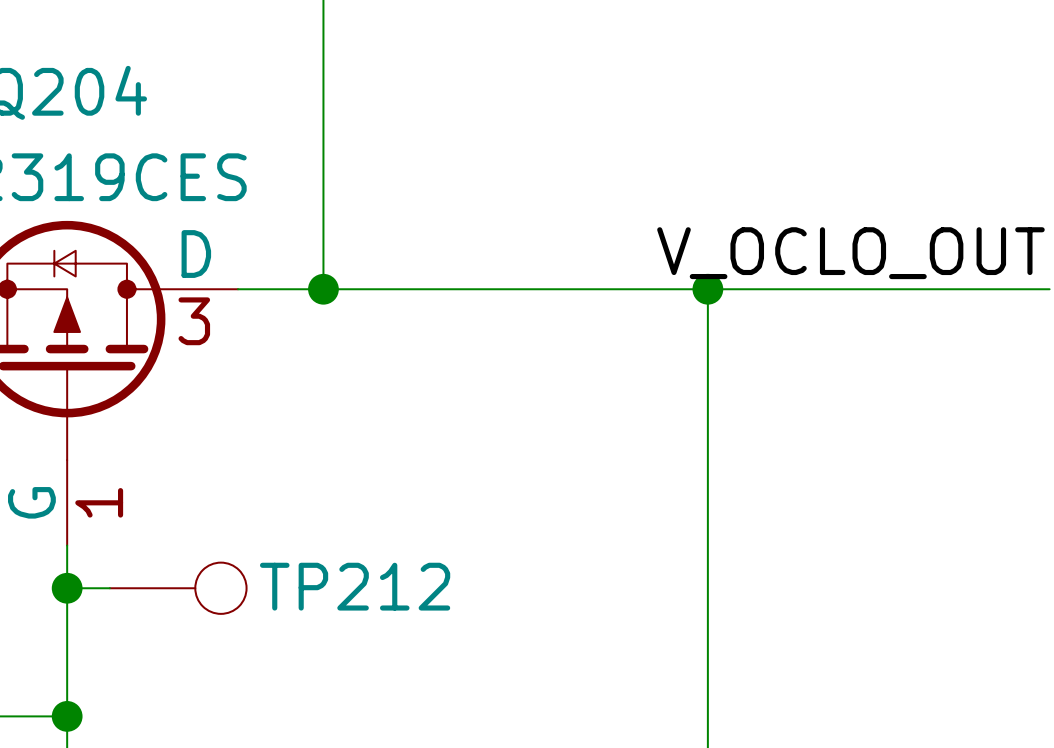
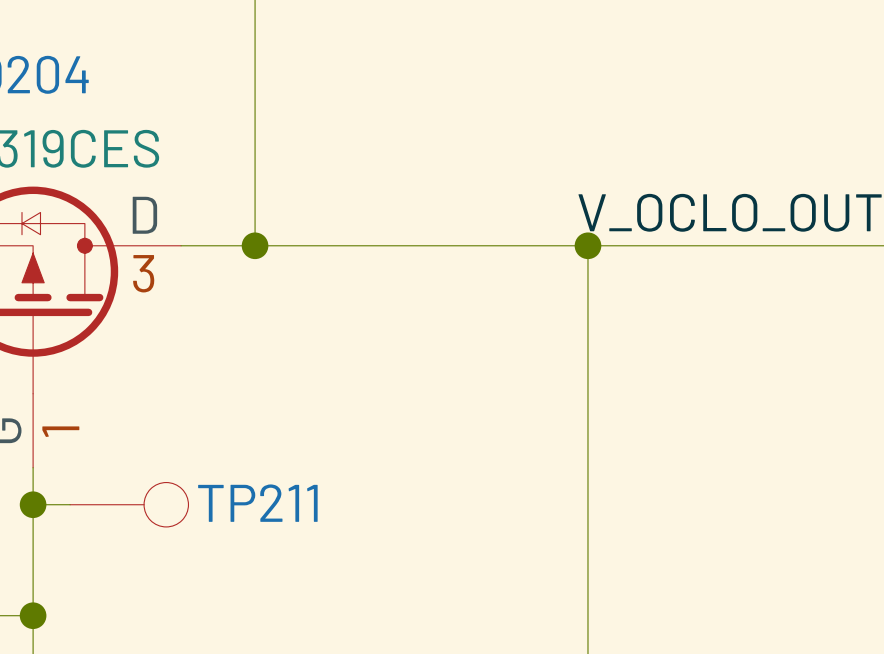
TP212 name: TP212 (355, 586) -> TP211 (257, 503)

